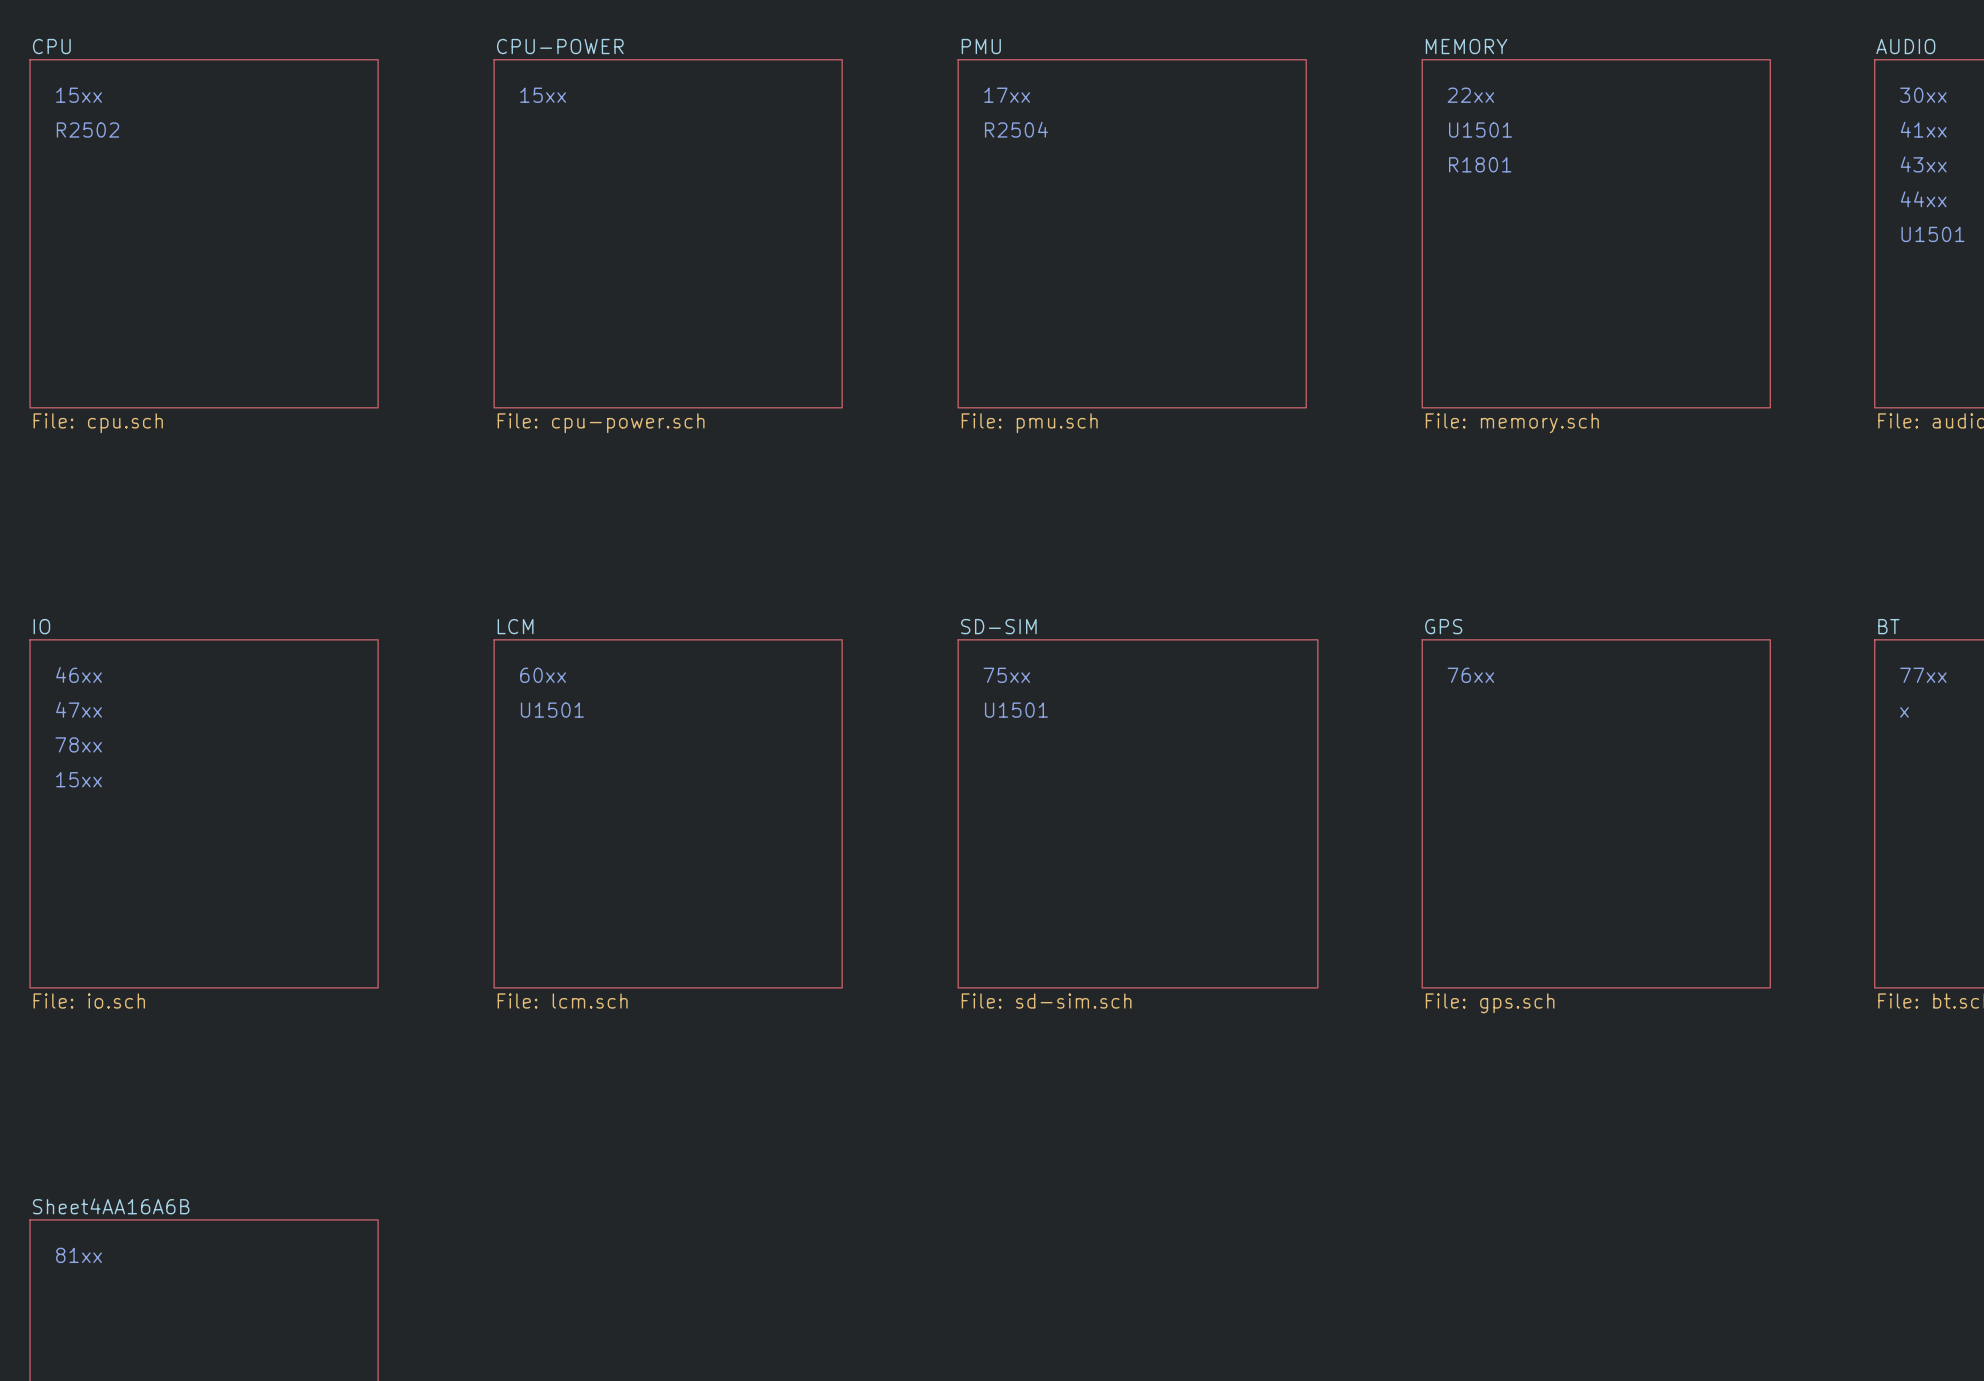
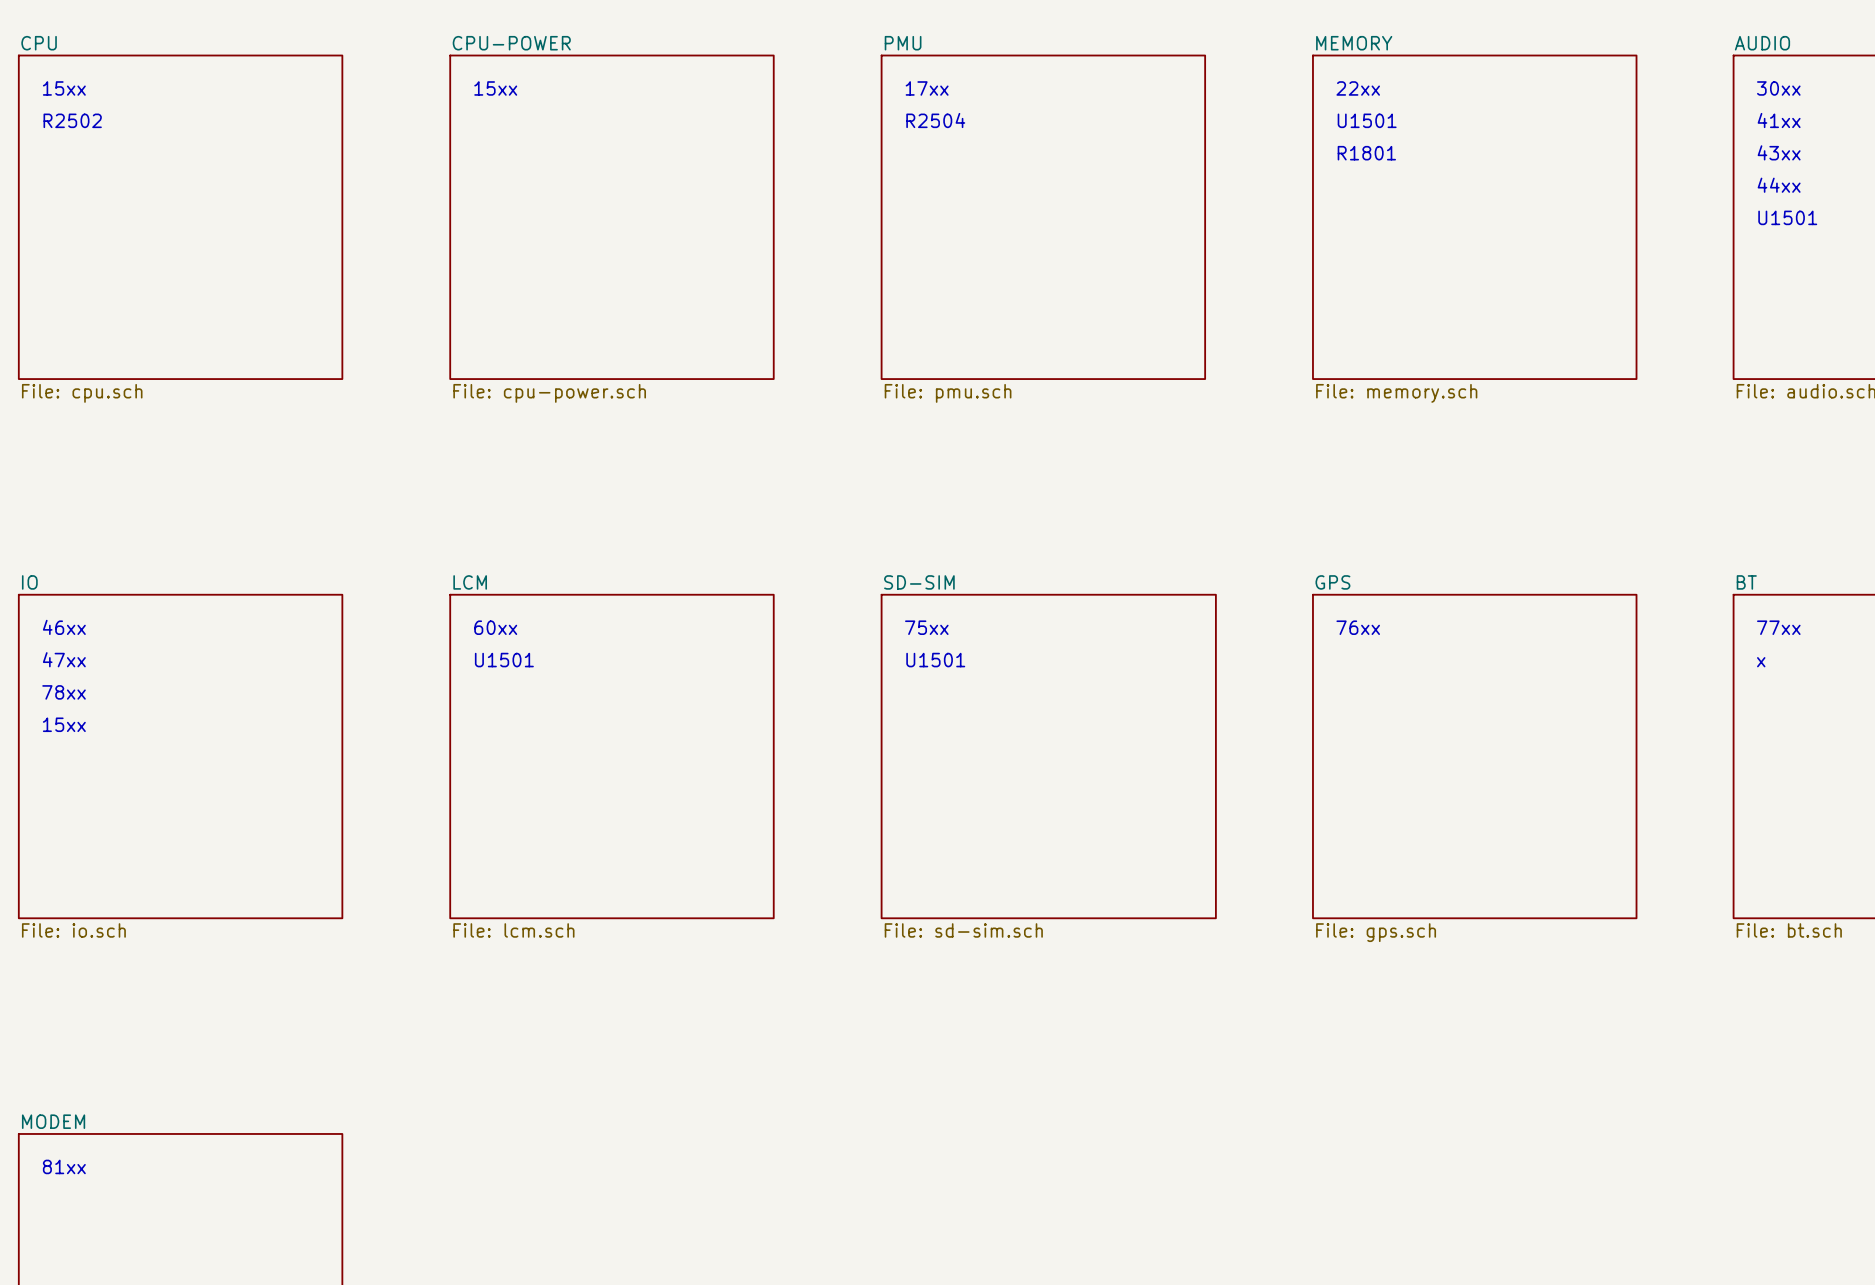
sheet Sheet4AA16A6B name: Sheet4AA16A6B (111, 1206) -> MODEM (53, 1121)

